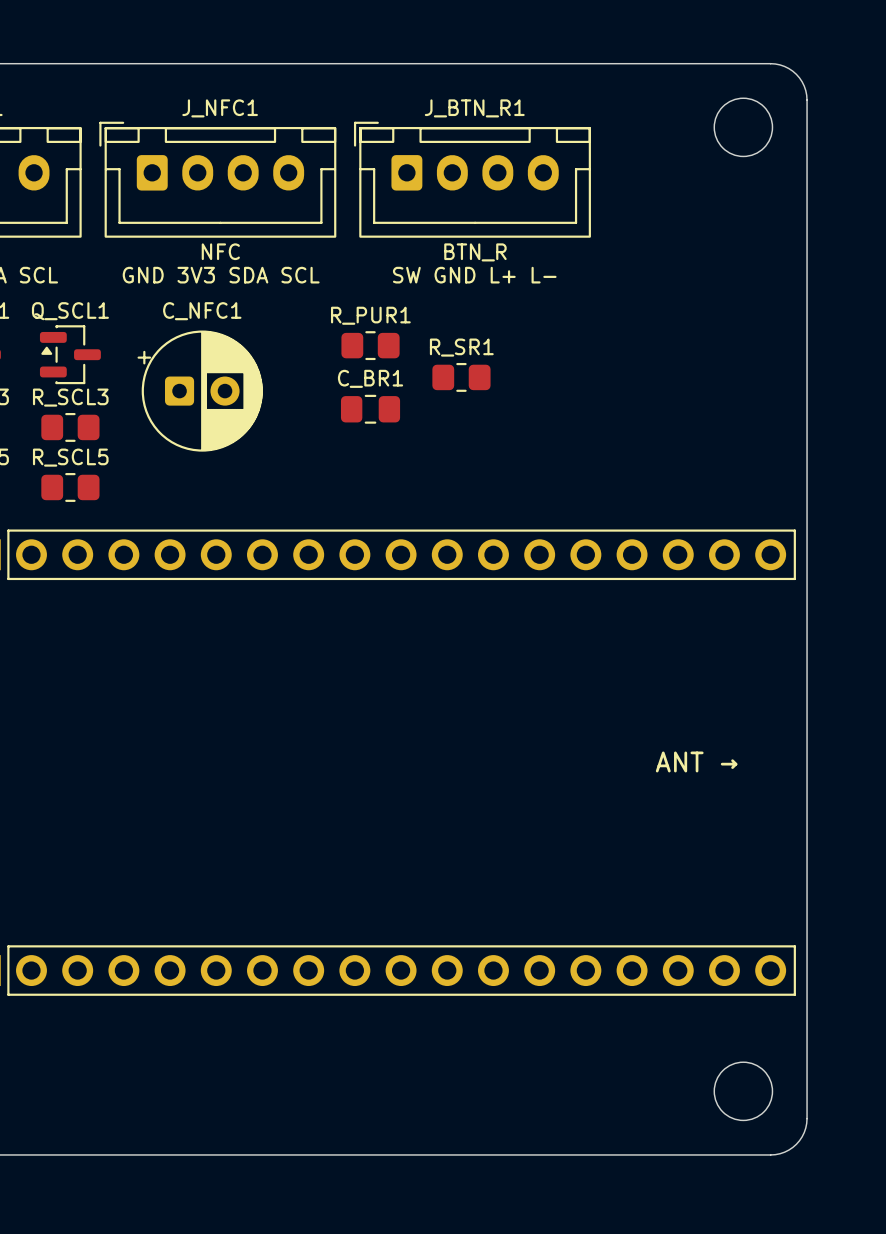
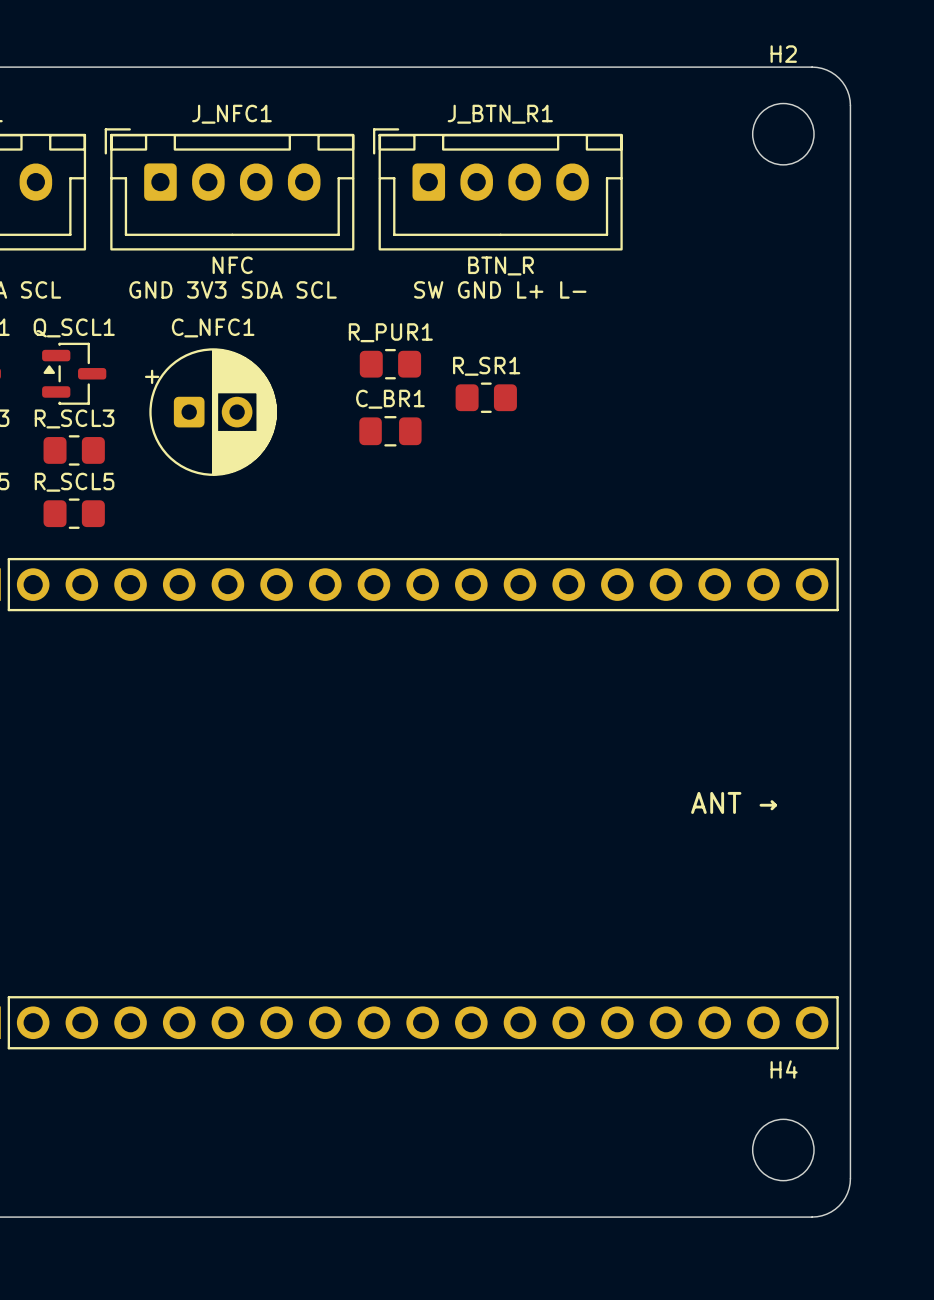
H2 name: none -> H2 (783, 54)
H4 name: none -> H4 (784, 1069)

